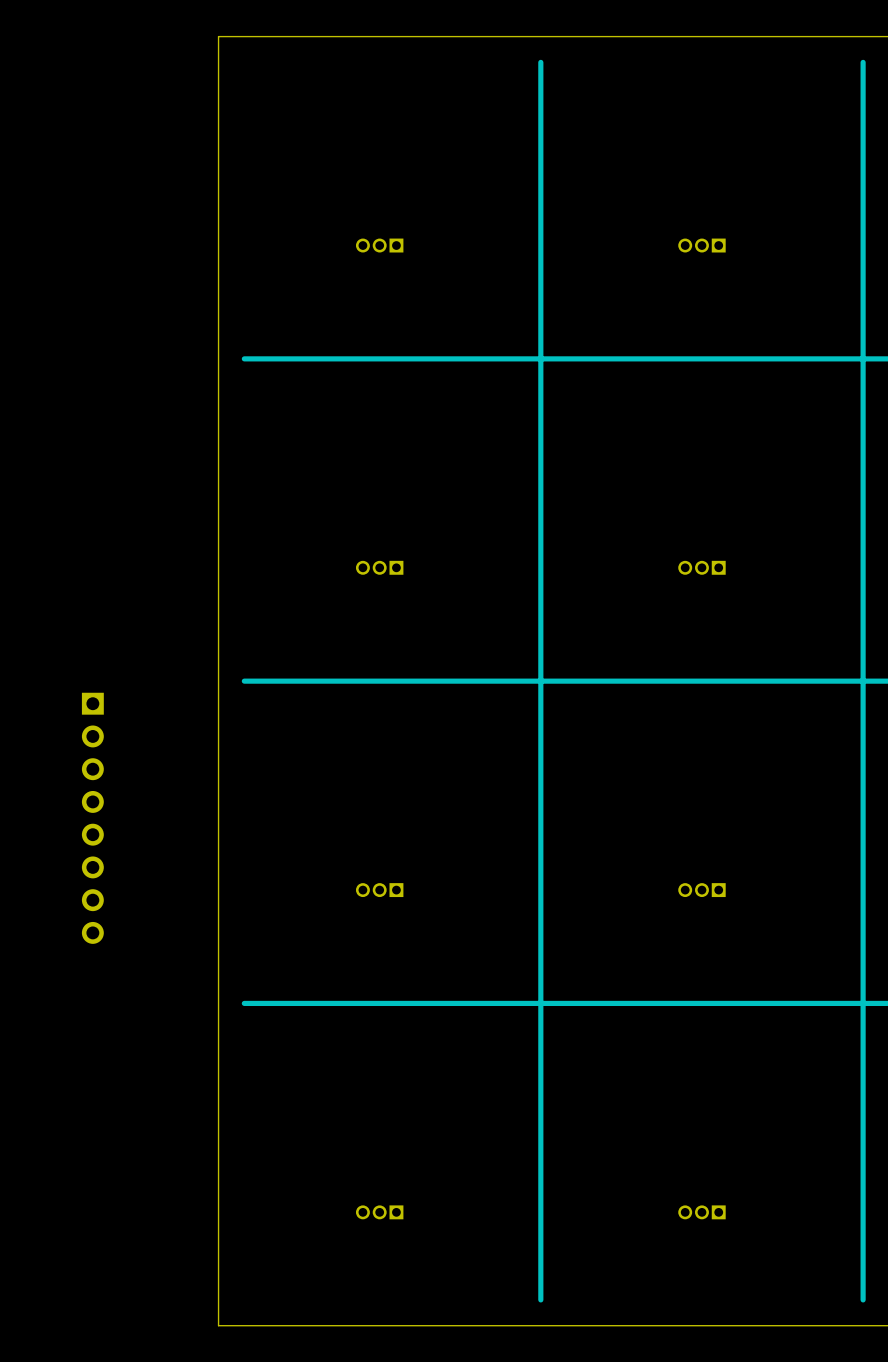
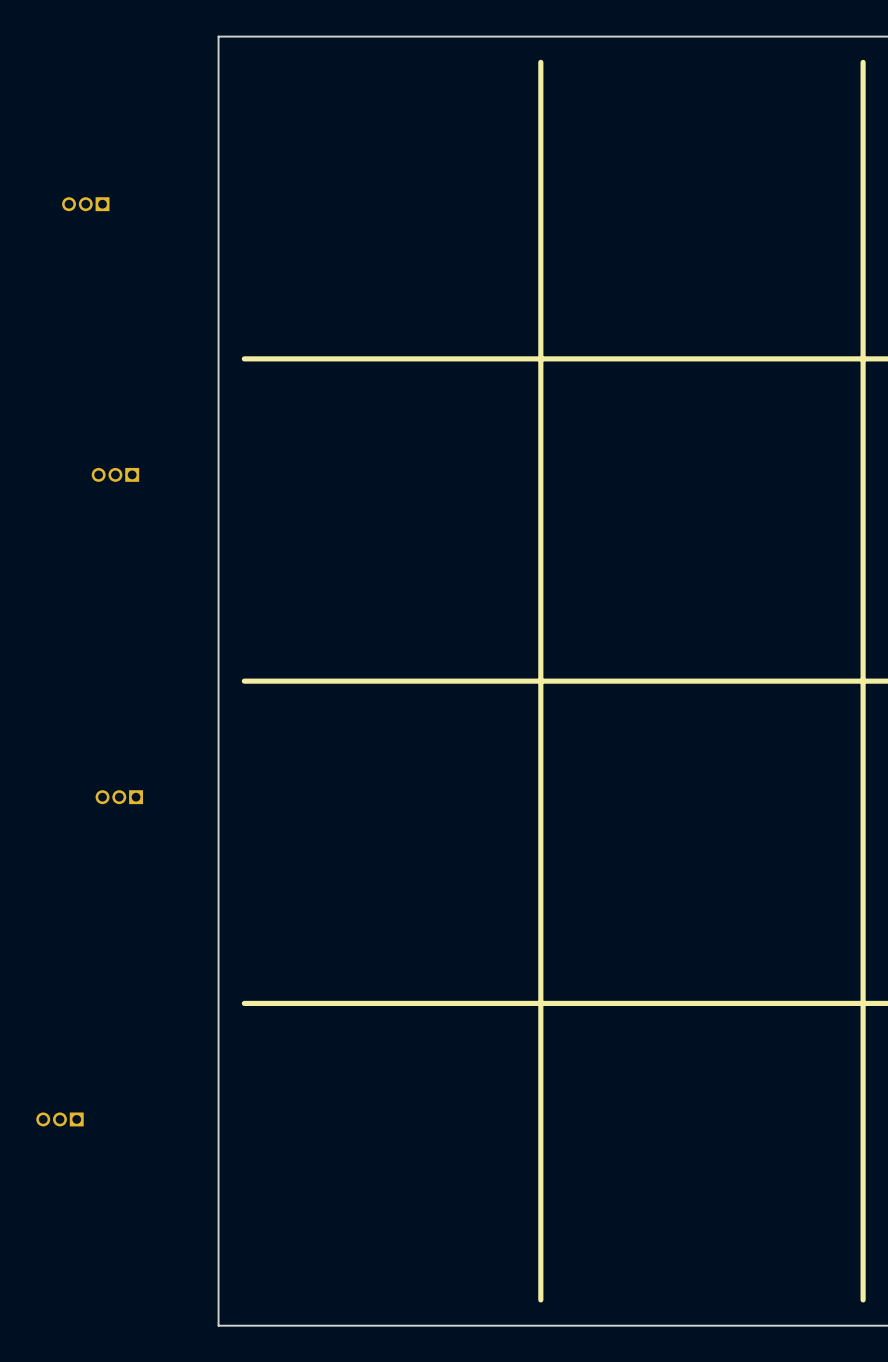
part: none -> (85, 204)
part: (379, 245) -> none
part: (701, 245) -> none
part: none -> (115, 474)
part: (379, 567) -> none
part: (701, 567) -> none
part: none -> (119, 797)
part: (92, 818) -> none
part: (379, 890) -> none
part: (701, 890) -> none
part: none -> (59, 1119)
part: (379, 1212) -> none
part: (701, 1212) -> none

